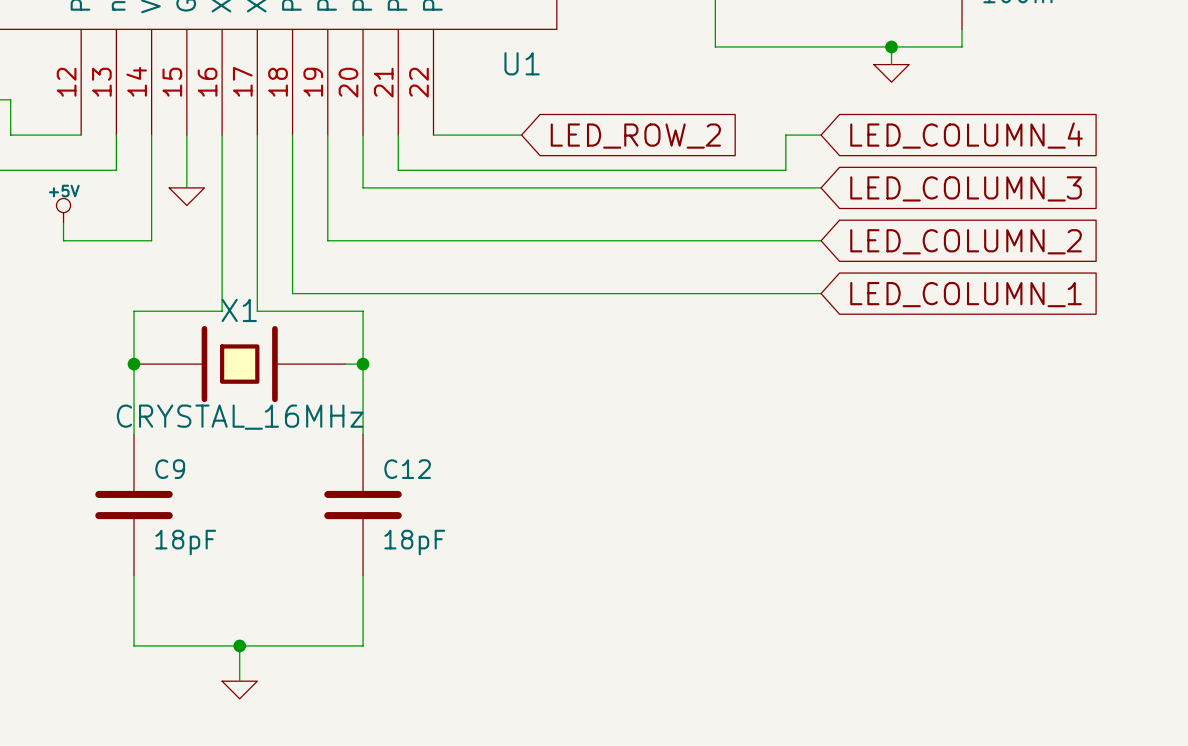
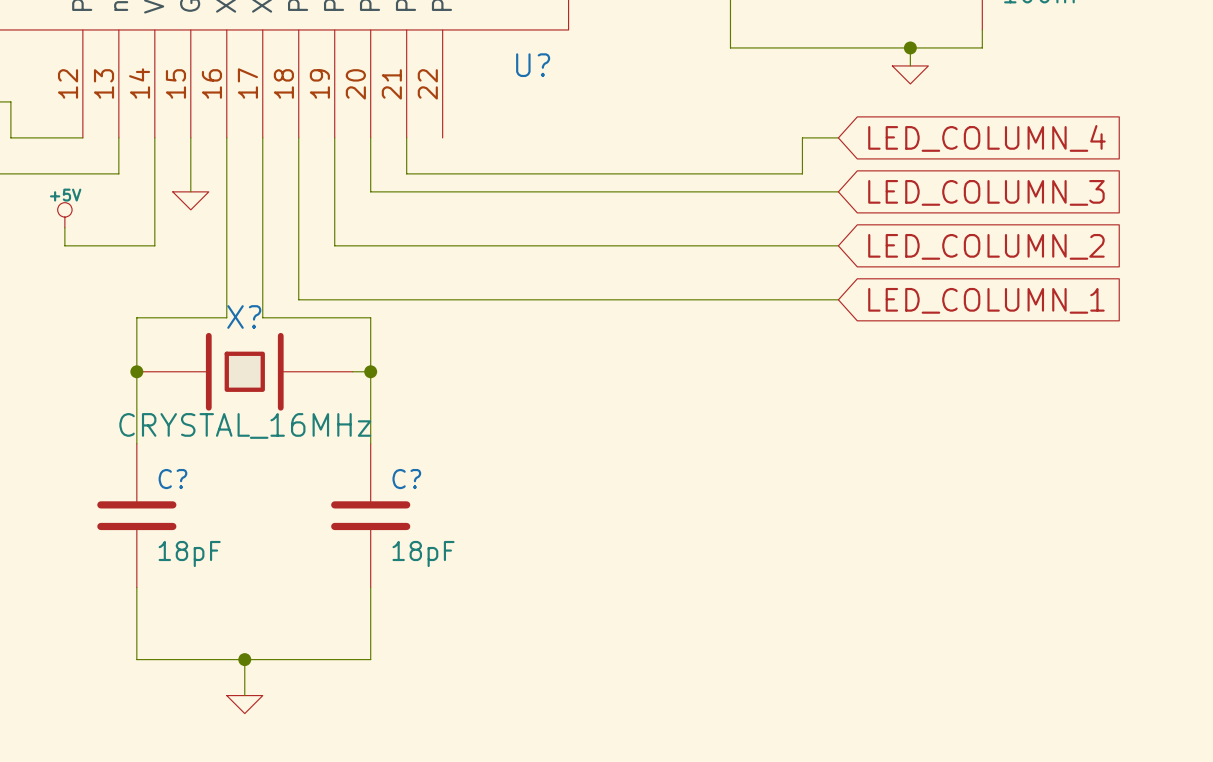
U1 name: U1 (522, 63) -> U? (533, 65)
wire: (433, 135) (521, 135) -> none
global label: LED_ROW_2 (635, 136) -> none
X1 name: X1 (239, 310) -> X? (244, 317)
C9 name: C9 (170, 469) -> C? (172, 479)
C12 name: C12 (407, 469) -> C? (406, 479)

